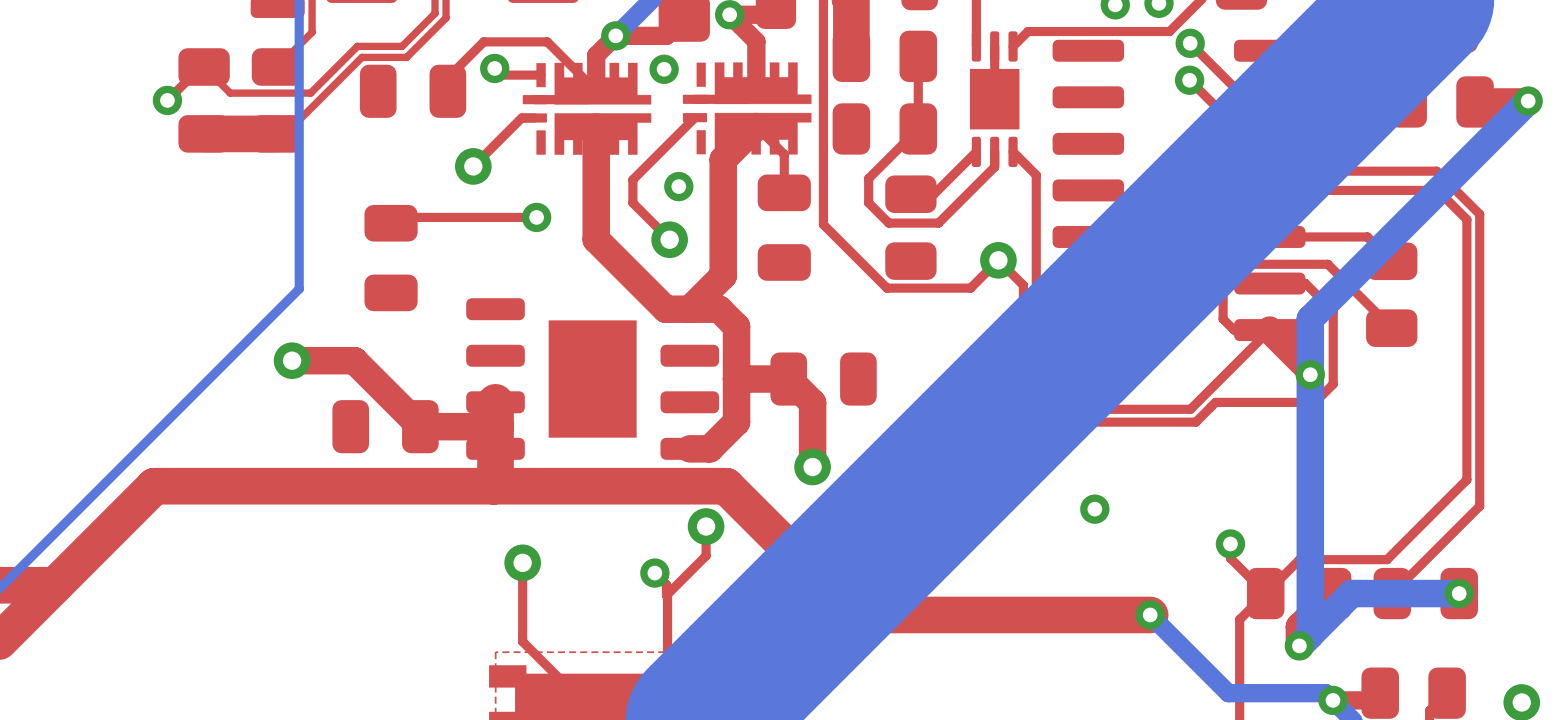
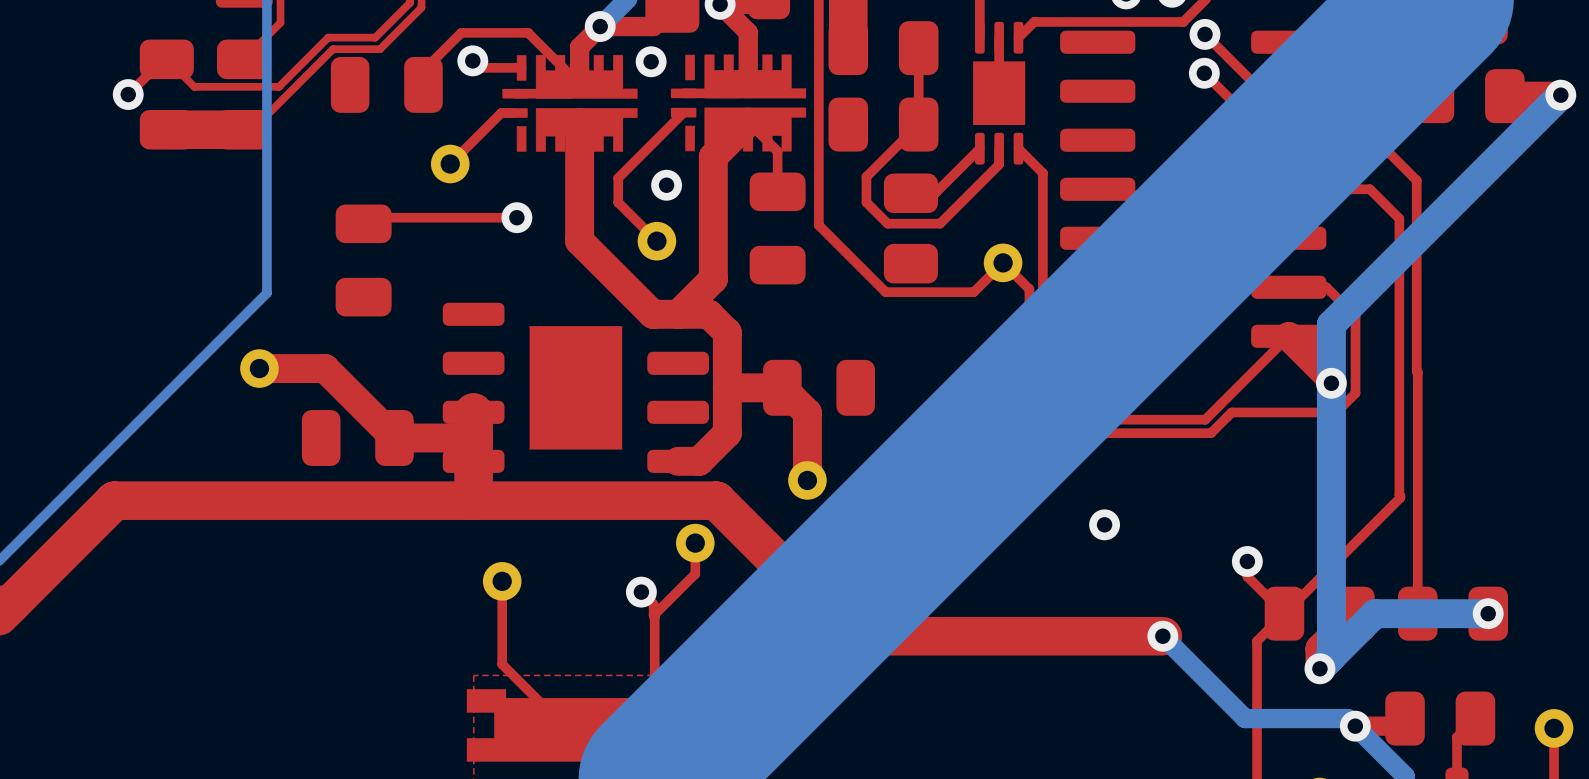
top track: (1269, 143) (1297, 171) (1436, 171) (1479, 214) (1479, 506) (1392, 593) -> (1288, 140) (1376, 140) (1416, 180) (1417, 613)
top track: (1346, 190) (1437, 190) (1466, 219) (1466, 479) (1387, 559) (1299, 559) -> (1369, 189) (1399, 218) (1400, 497) (1320, 577)
top track: (1269, 236) (1367, 236) (1391, 261) -> none
part: (1391, 294) -> none
top track: (1391, 328) (1327, 264) (1233, 264) (1223, 274) (1223, 319) (1234, 330) (1269, 330) -> none

